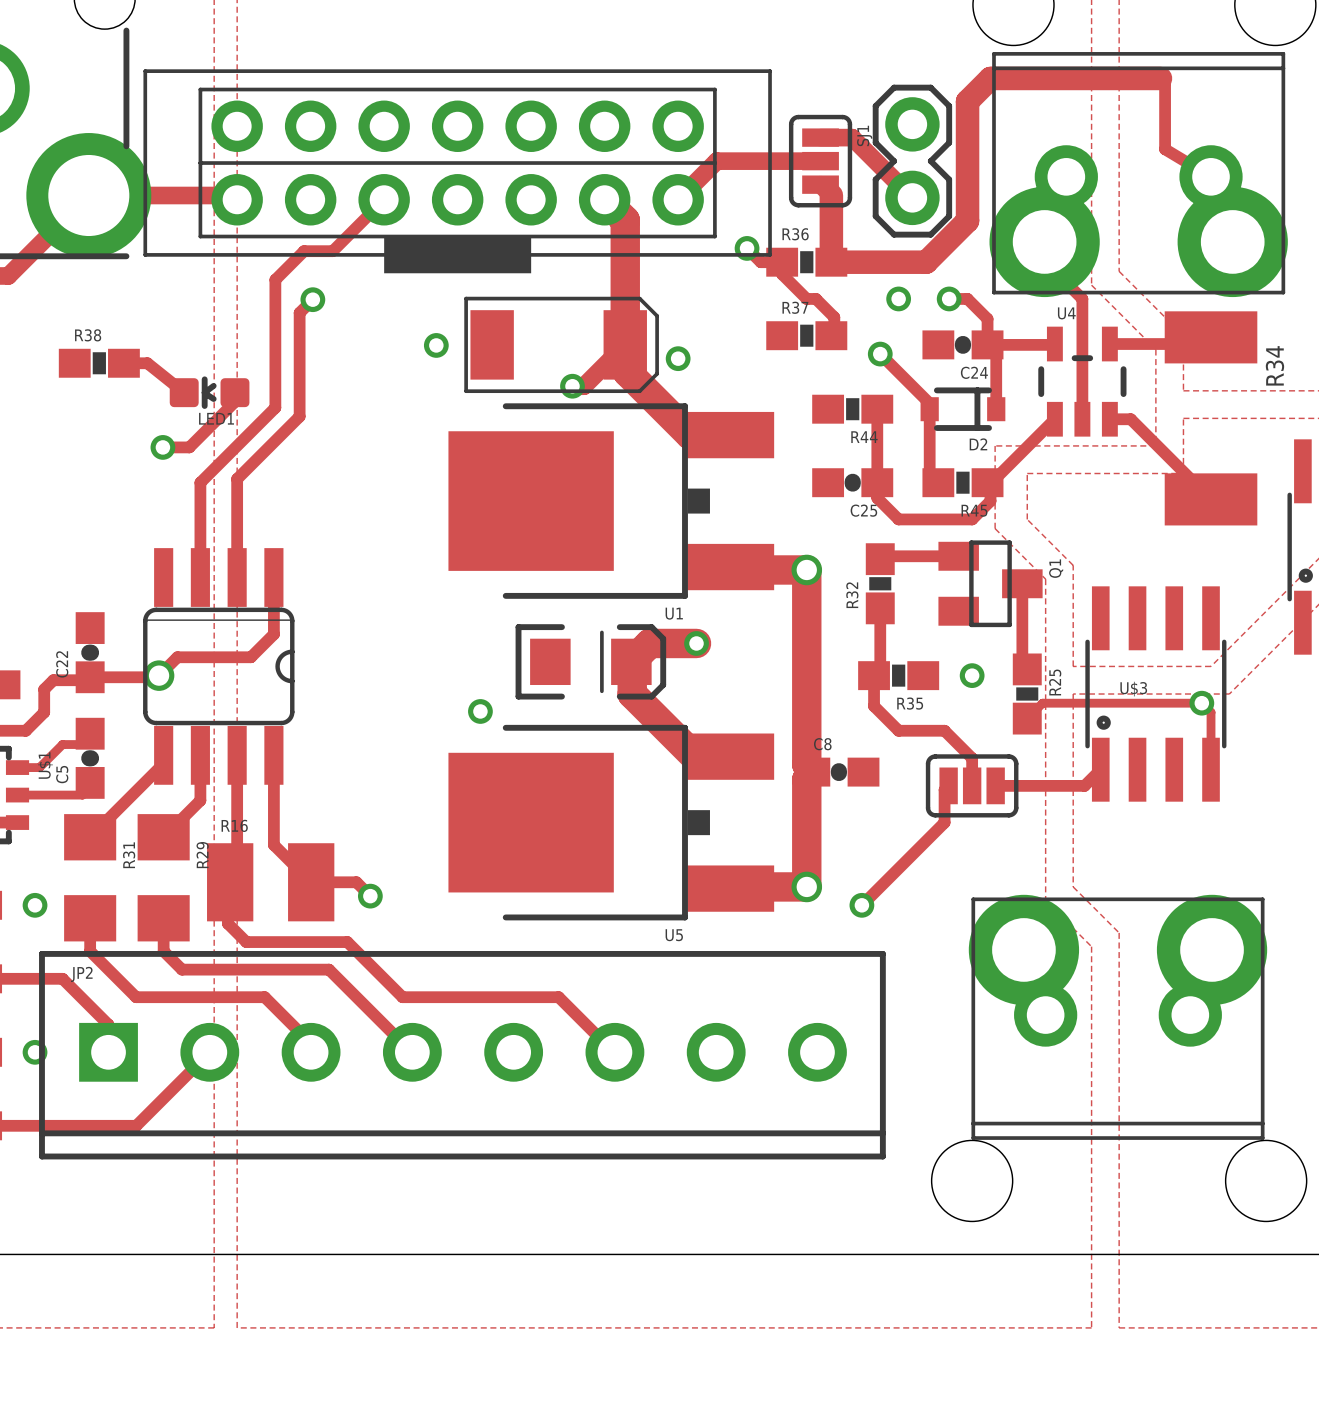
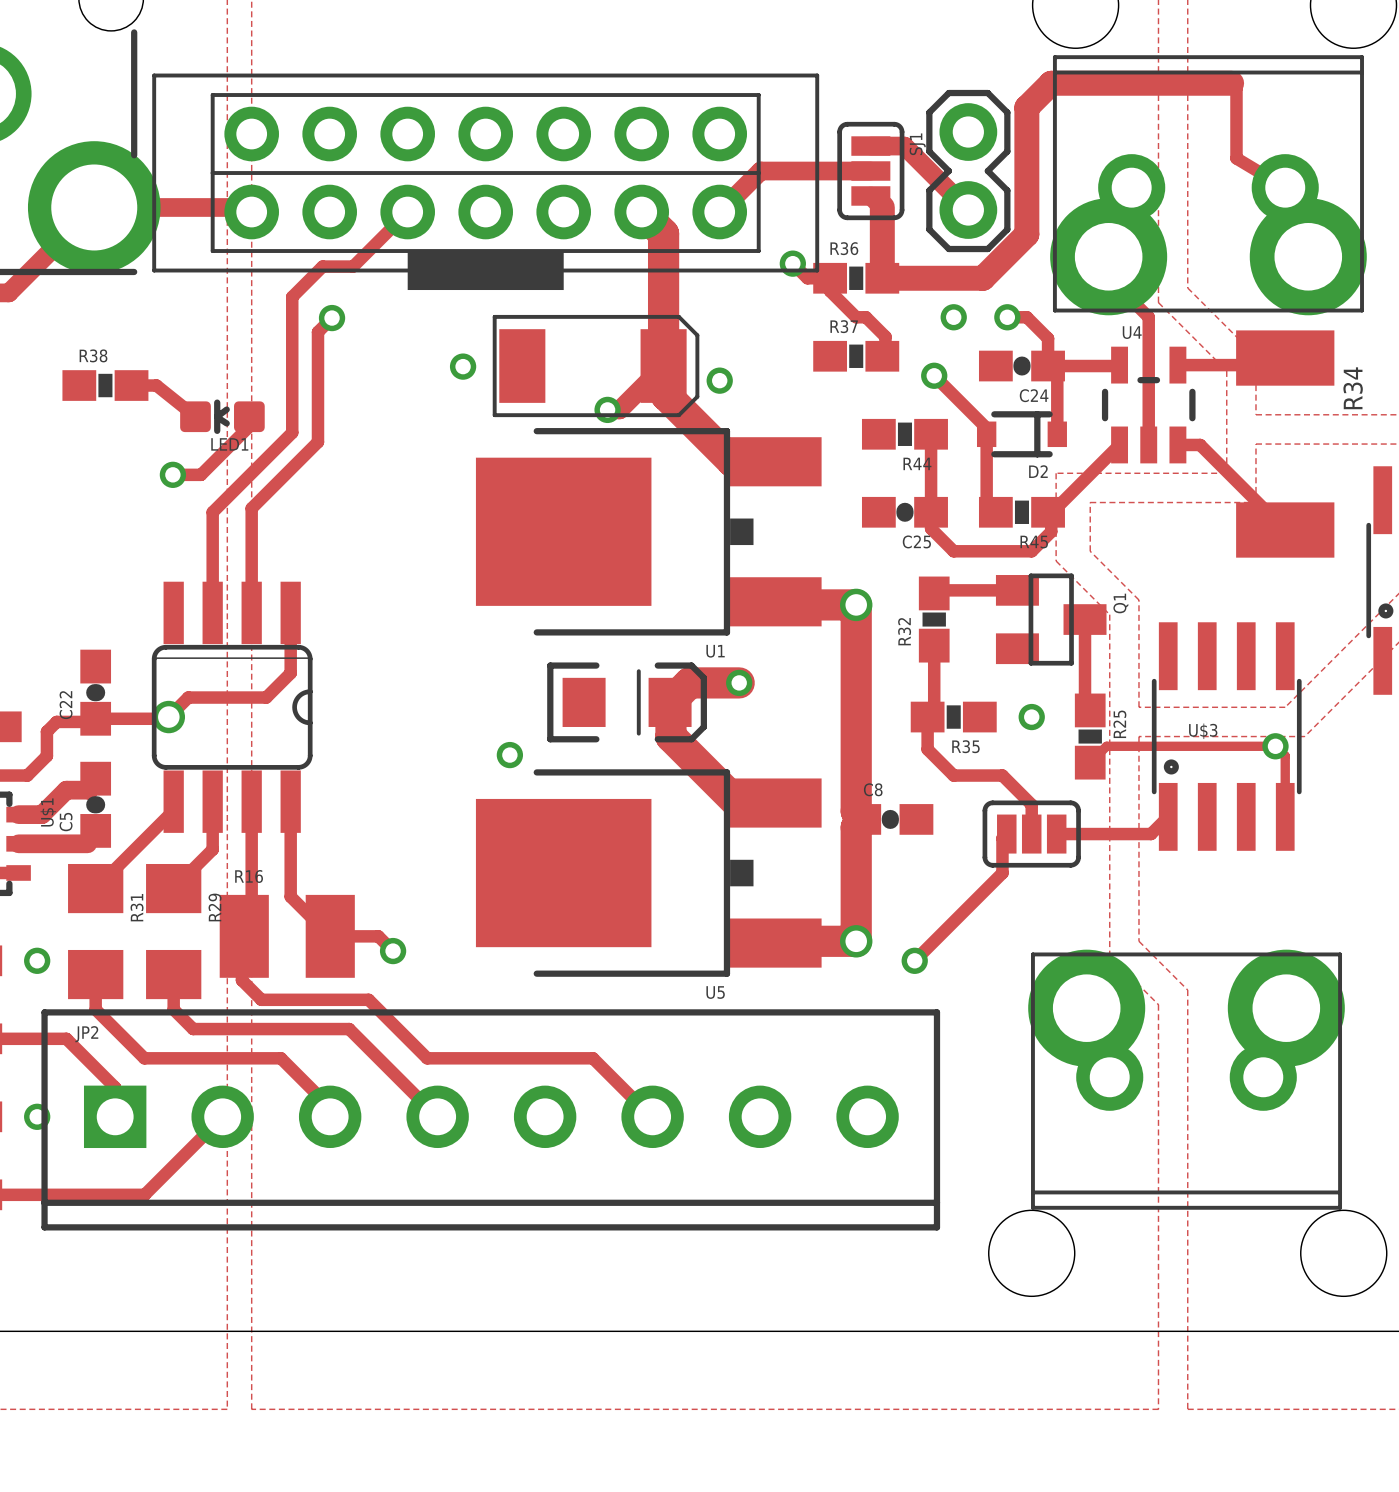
track width: thin (90, 733) (83, 744) (62, 744) (39, 767) (17, 767) -> thick (95, 778) (89, 790) (66, 790) (41, 814) (18, 814)
track width: thin (17, 795) (82, 795) -> thick (18, 843) (87, 843)

